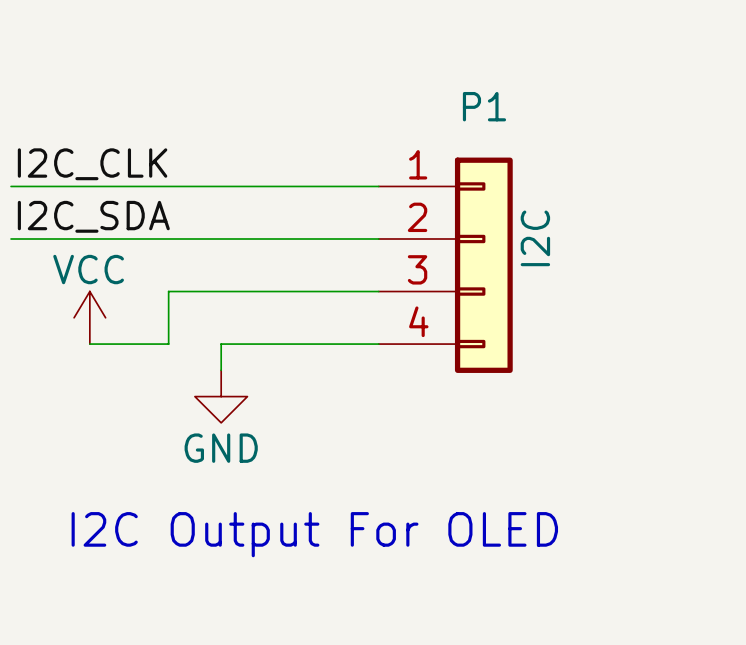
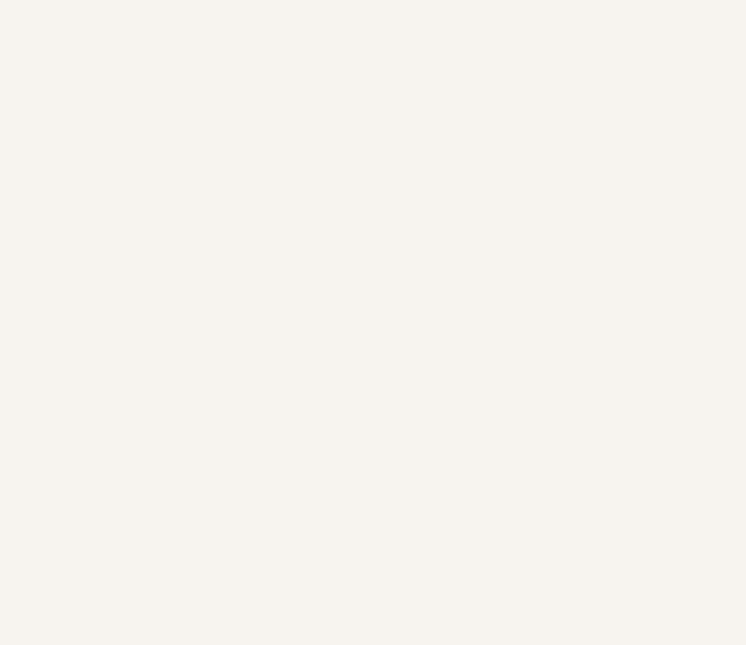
label: I2C_CLK (92, 164) -> none
wire: (11, 186) (378, 186) -> none
label: I2C_SDA (93, 216) -> none
wire: (11, 238) (378, 238) -> none
P1: I2C (445, 265) -> none
wire: (378, 291) (168, 291) (168, 344) (89, 344) -> none
power symbol: VCC (89, 317) -> none
wire: (378, 344) (221, 344) (221, 370) -> none
power symbol: GND (221, 396) -> none
text: I2C Output For OLED (314, 534) -> none

